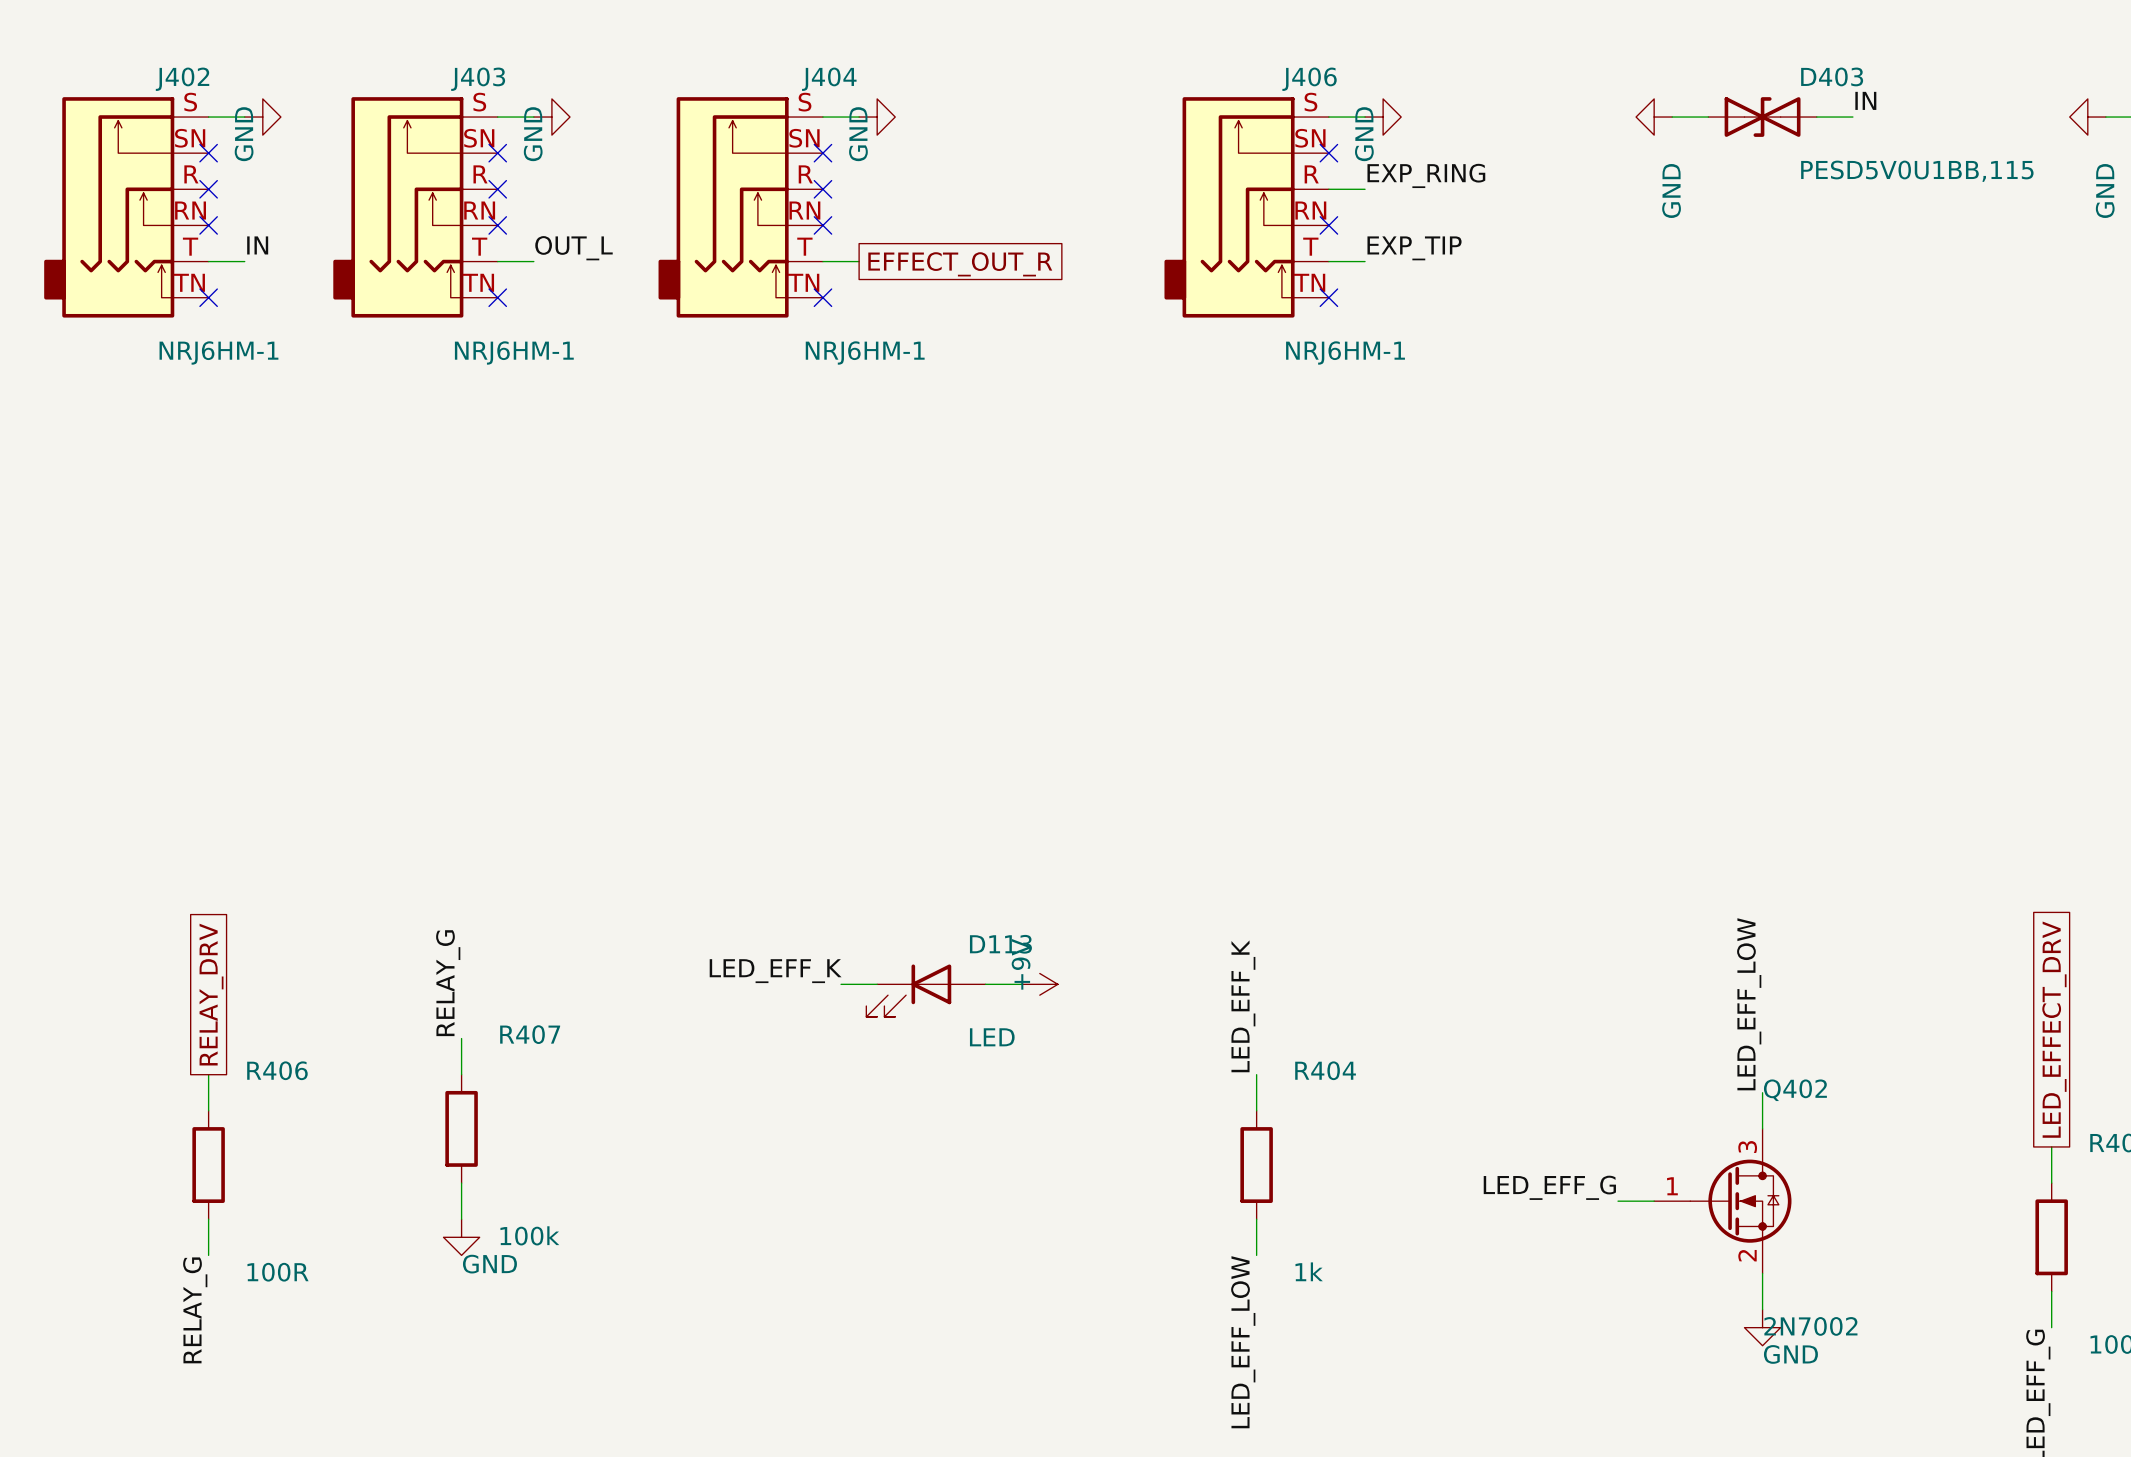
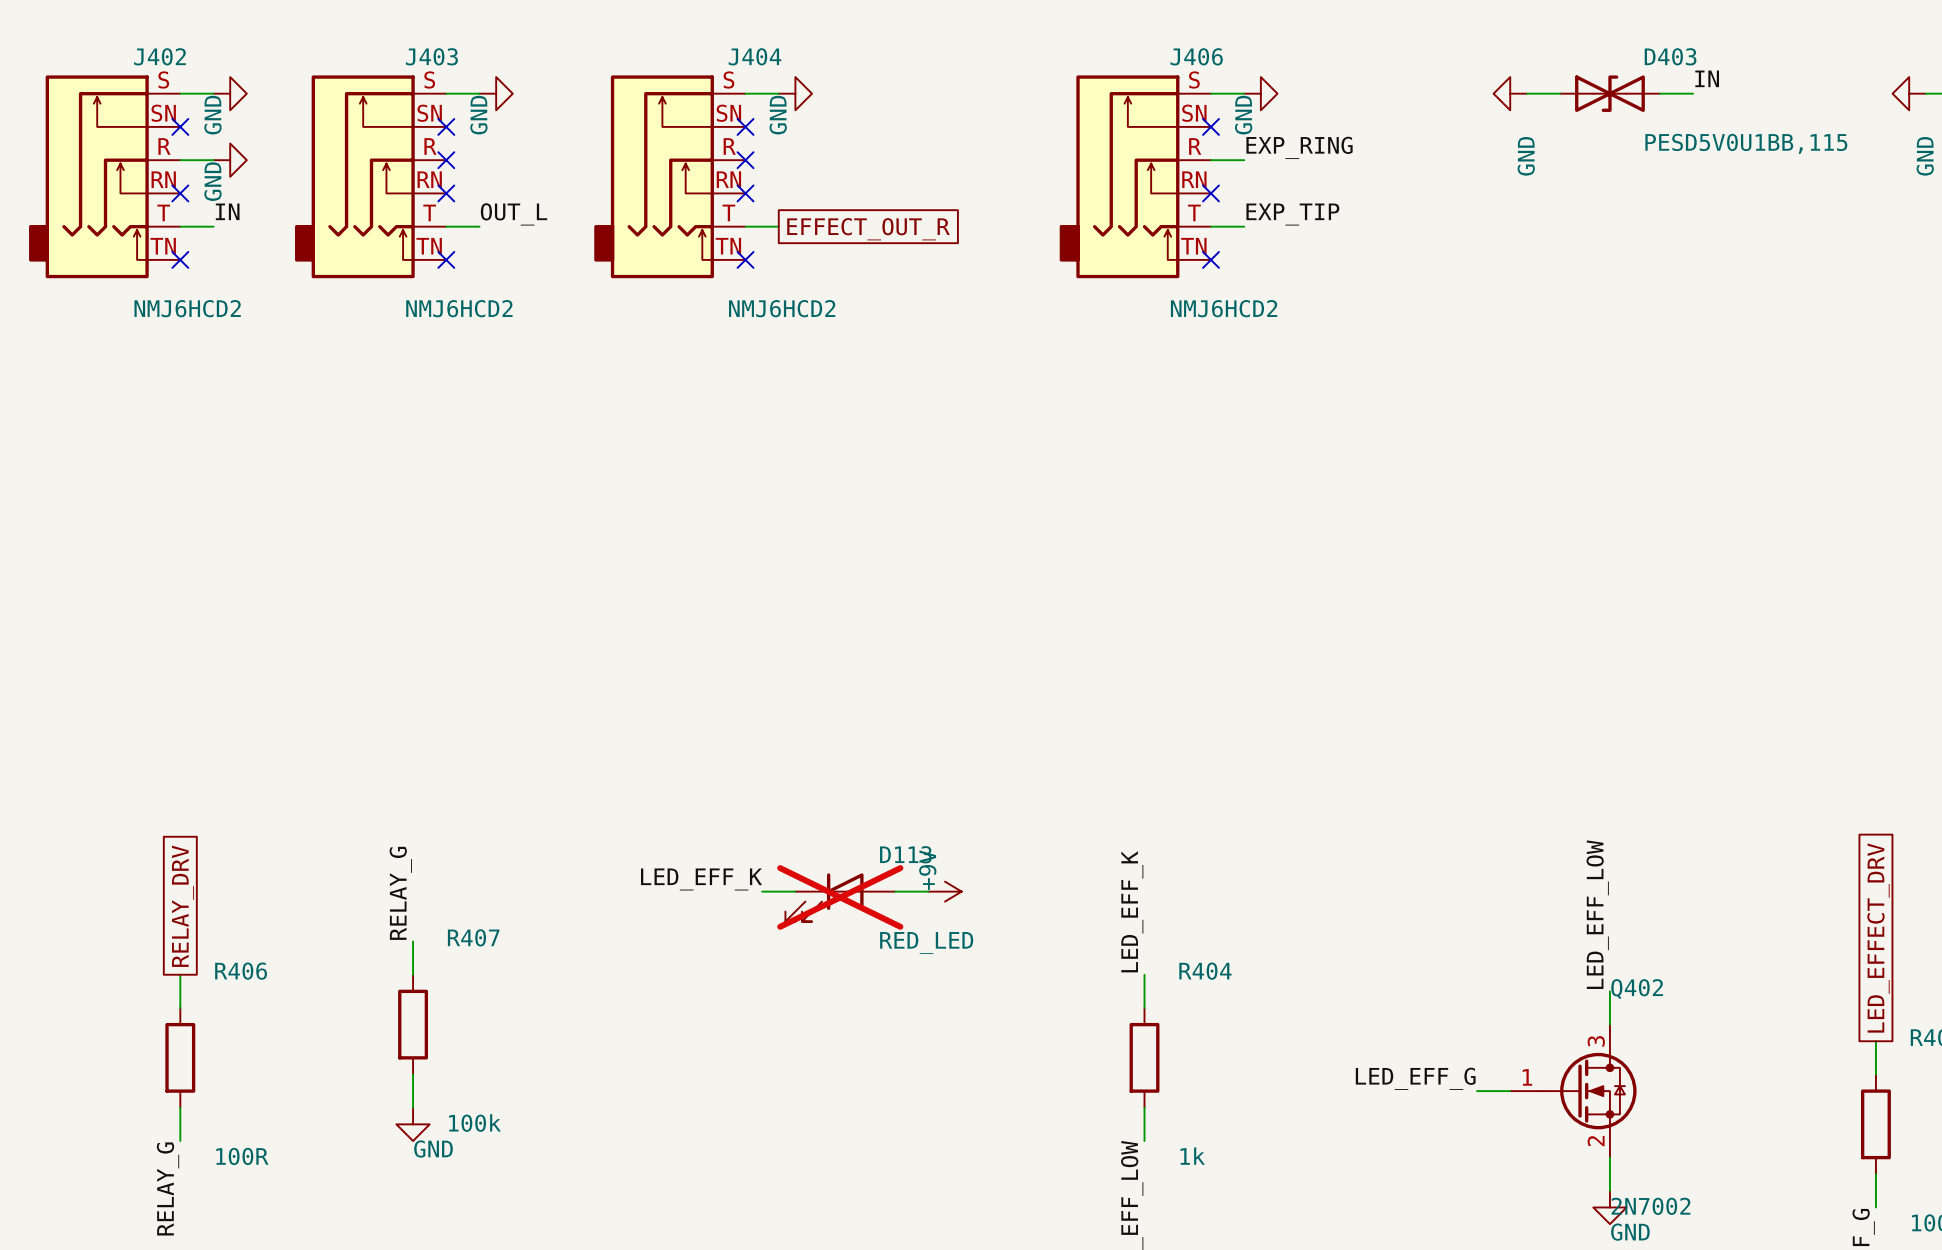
wire: none -> (180, 160) (213, 160)
no-connect mark: (208, 189) -> none
power symbol: none -> GND (230, 160)
J402 value: NRJ6HM-1 (218, 352) -> NMJ6HCD2 (187, 308)
J403 value: NRJ6HM-1 (514, 352) -> NMJ6HCD2 (459, 308)
J404 value: NRJ6HM-1 (865, 352) -> NMJ6HCD2 (782, 308)
J406 value: NRJ6HM-1 (1345, 352) -> NMJ6HCD2 (1224, 308)
D113 do-not-place cross: none -> (840, 897)
D113 value: LED (992, 1037) -> RED_LED (926, 943)

